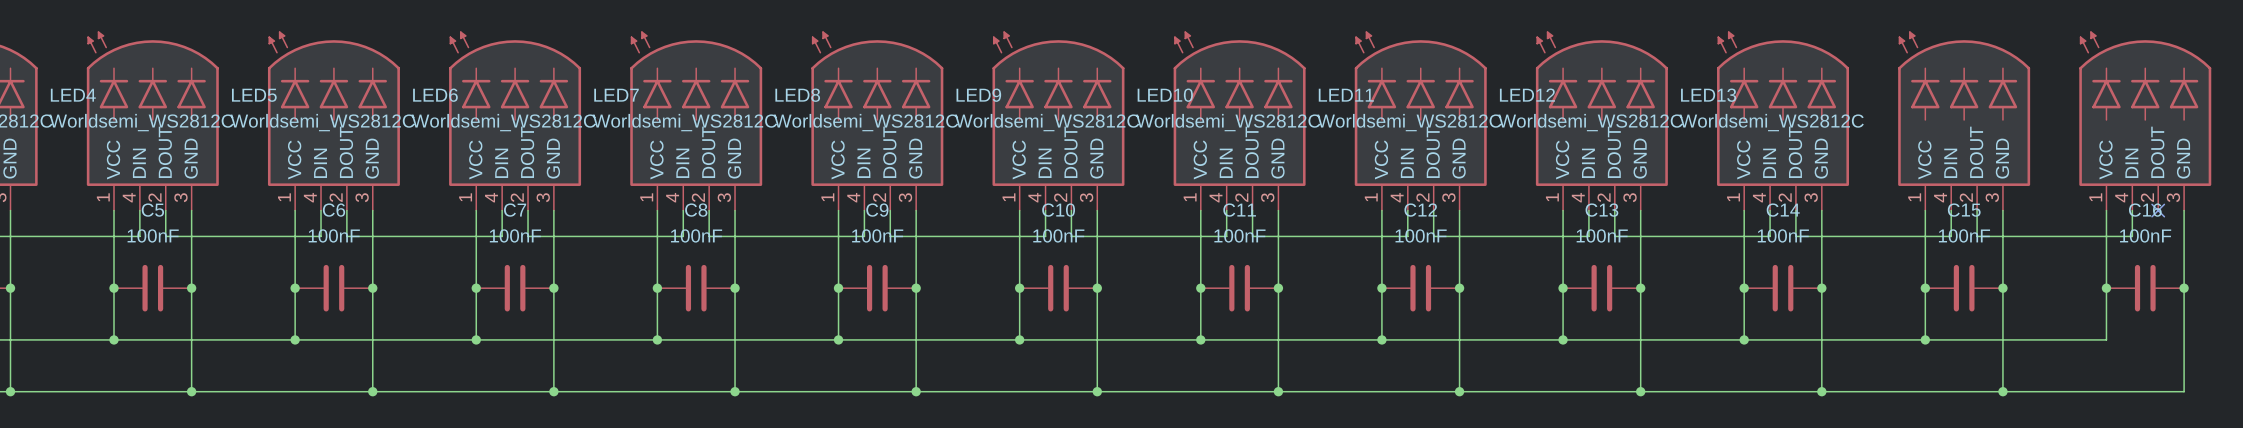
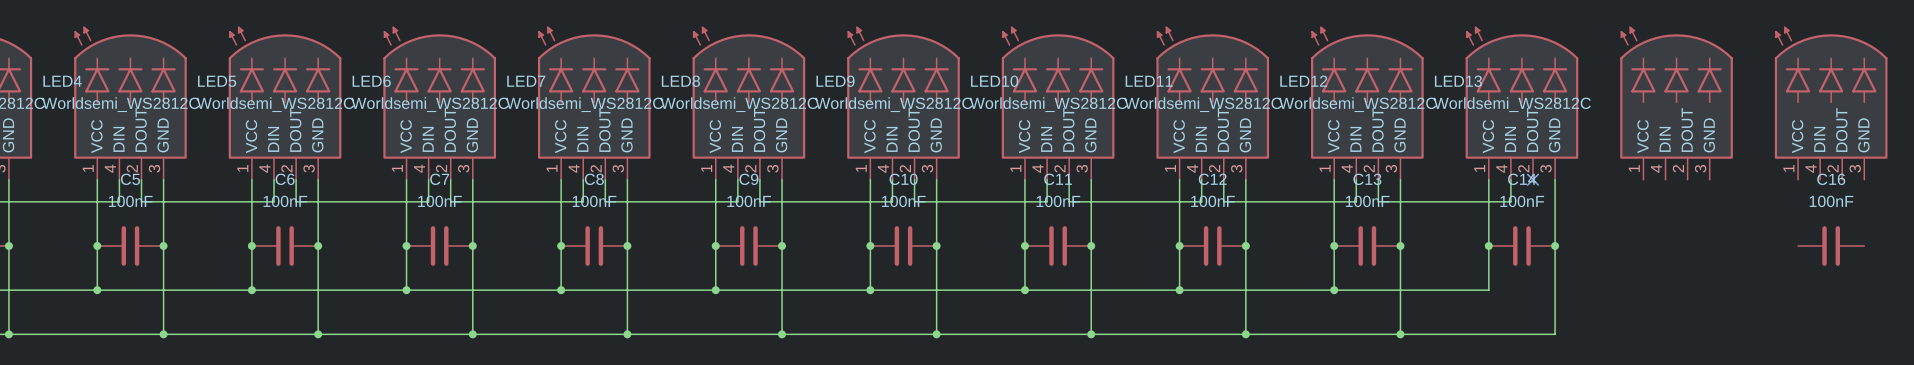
wire: (1795, 210) (1795, 236) (1951, 236) (1951, 210) -> none
no-connect mark: none -> (1532, 179)
wire: (1925, 210) (1925, 339) -> none
wire: (1977, 210) (1977, 236) (2132, 236) (2132, 210) -> none
wire: (2002, 210) (2002, 391) -> none
wire: (2106, 210) (2106, 339) (1744, 339) -> none
no-connect mark: (2158, 210) -> none
wire: (2184, 210) (2184, 391) (1821, 391) -> none
junction: (1925, 288) -> none
C15: 100nF (1964, 288) -> none
junction: (2002, 288) -> none
junction: (2106, 288) -> none
junction: (2184, 288) -> none
junction: (1744, 339) -> none
junction: (1925, 339) -> none
junction: (1821, 391) -> none
junction: (2002, 391) -> none

